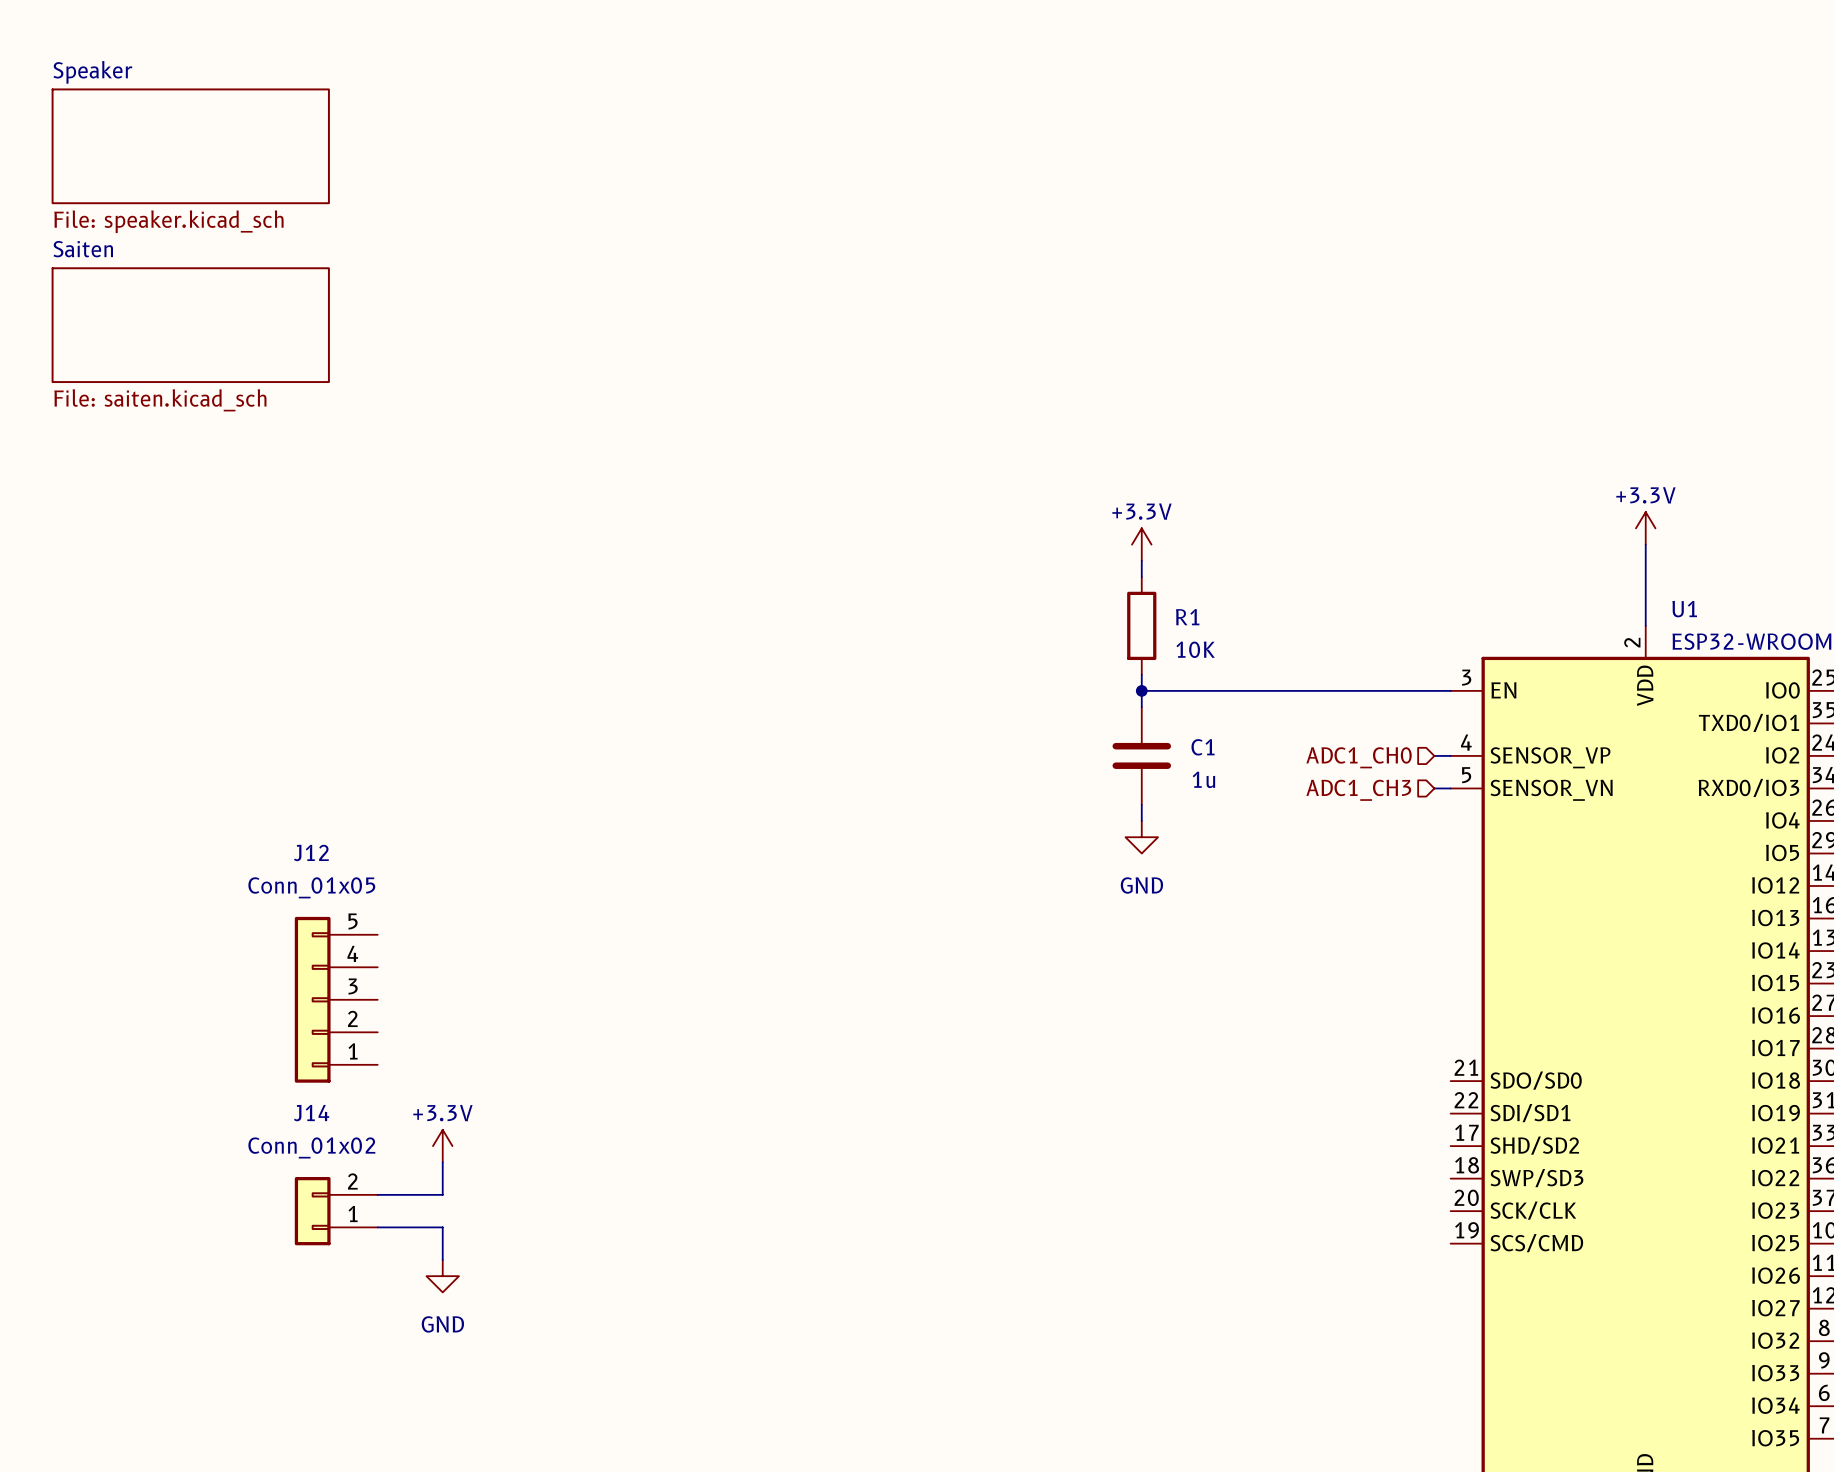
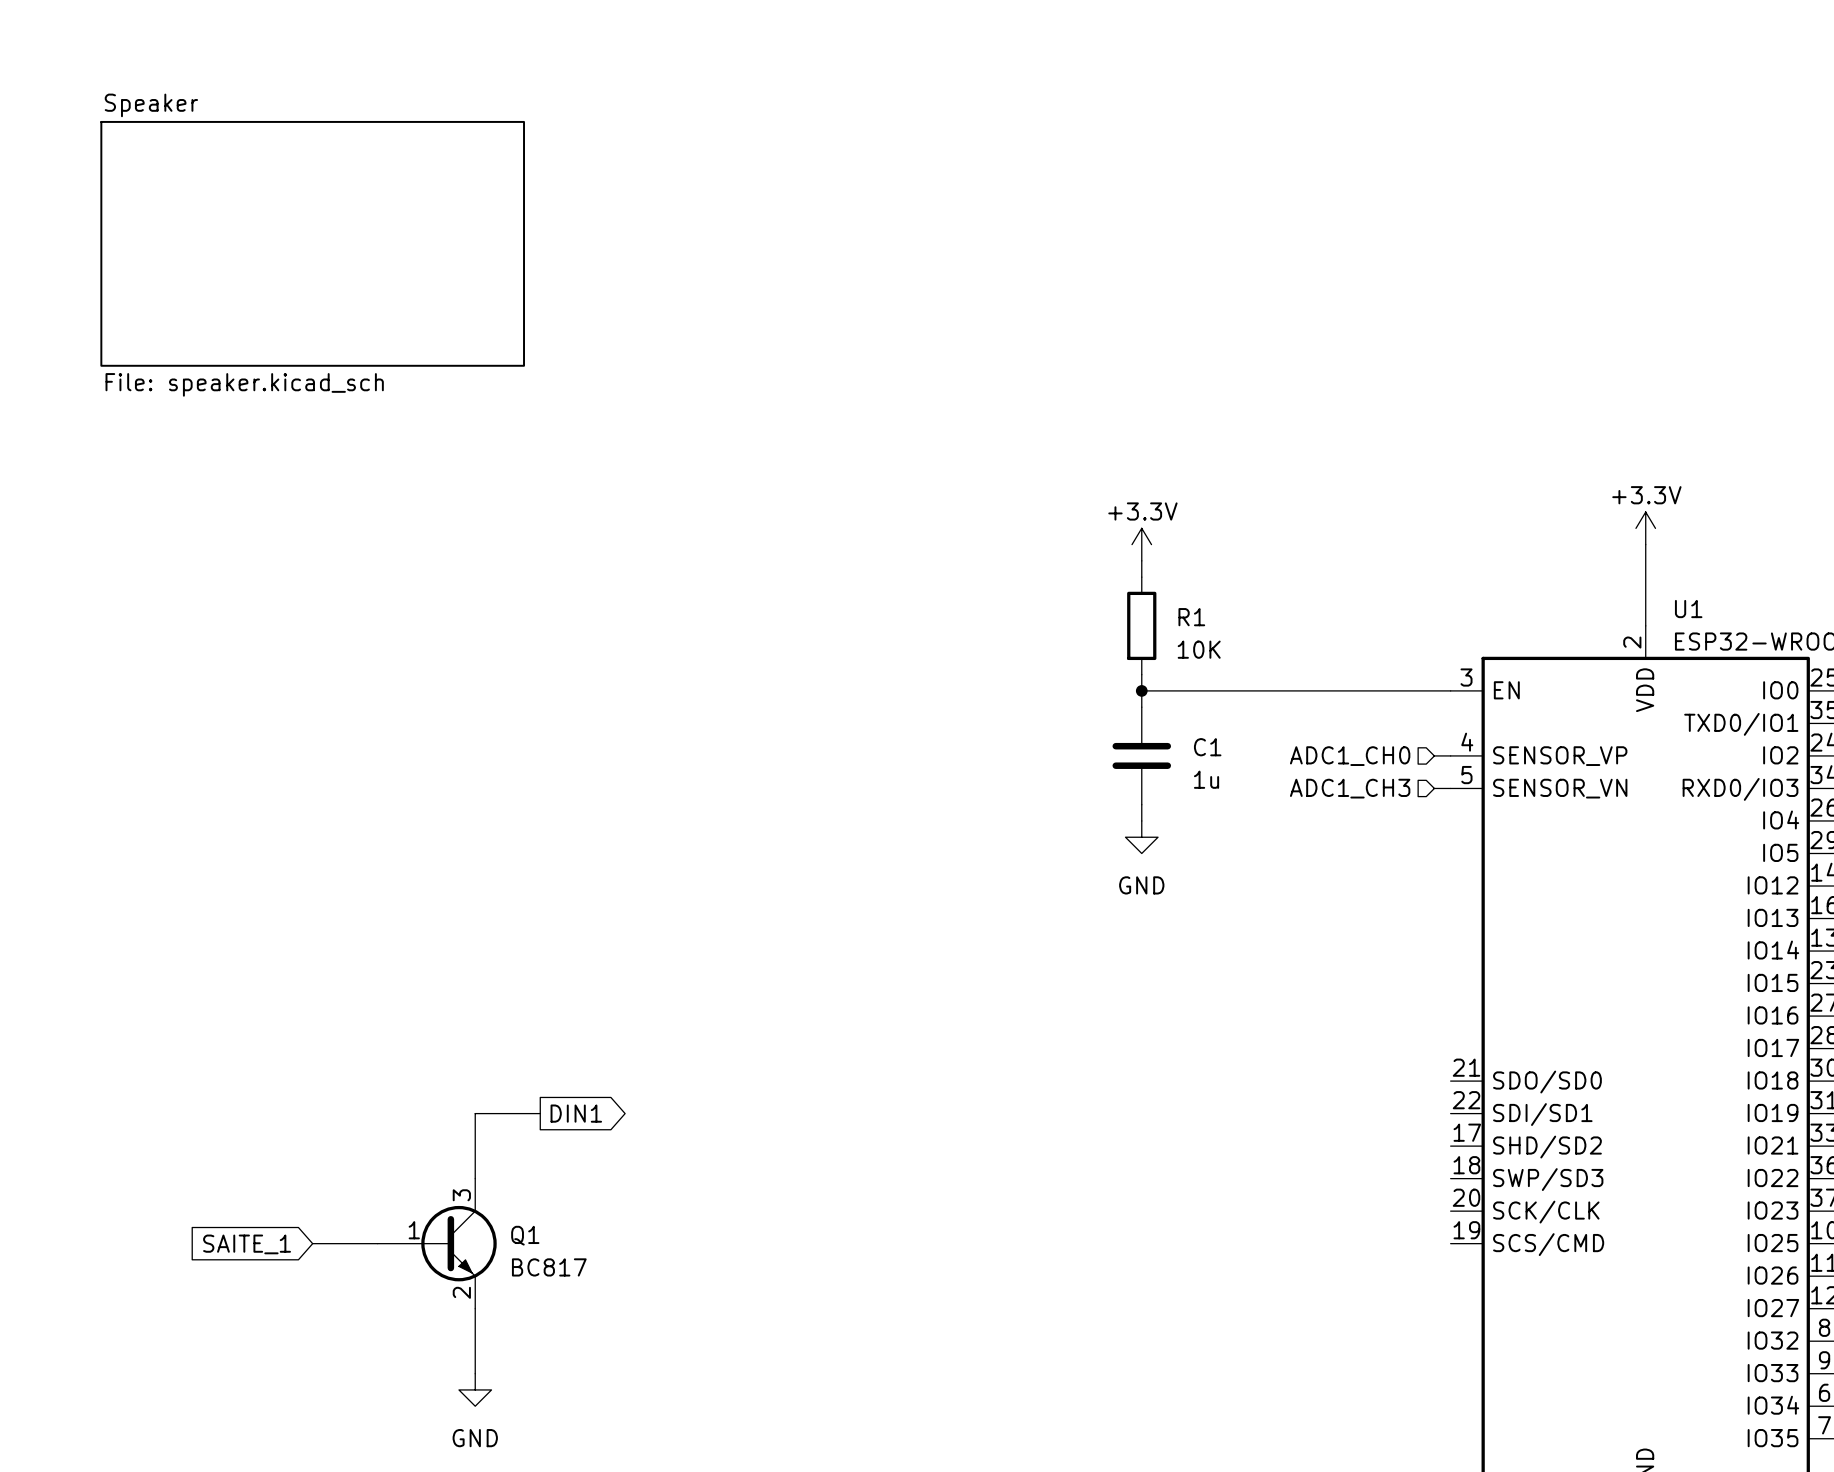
sheet Speaker: File: speaker.kicad_sch (190, 146) -> none
sheet Speaker: none -> File: speaker.kicad_sch (312, 243)
sheet Saiten: File: saiten.kicad_sch (190, 325) -> none
J12: Conn_01x05 (336, 999) -> none
wire: none -> (540, 1113) (475, 1113) (475, 1178)
global label: none -> DIN1 (576, 1113)
power symbol: +3.3V (442, 1146) -> none
wire: (442, 1162) (442, 1194) (377, 1194) -> none
J14: Conn_01x02 (336, 1211) -> none
wire: (377, 1227) (442, 1227) (442, 1259) -> none
wire: none -> (312, 1243) (377, 1243)
Q1: none -> BC817 (437, 1243)
global label: none -> SAITE_1 (247, 1244)
power symbol position: GND (442, 1276) -> GND (475, 1389)
wire: none -> (475, 1308) (475, 1373)

